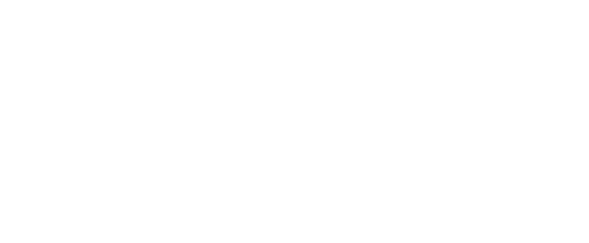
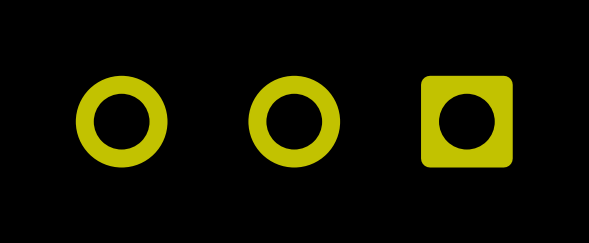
part: none -> (294, 121)

